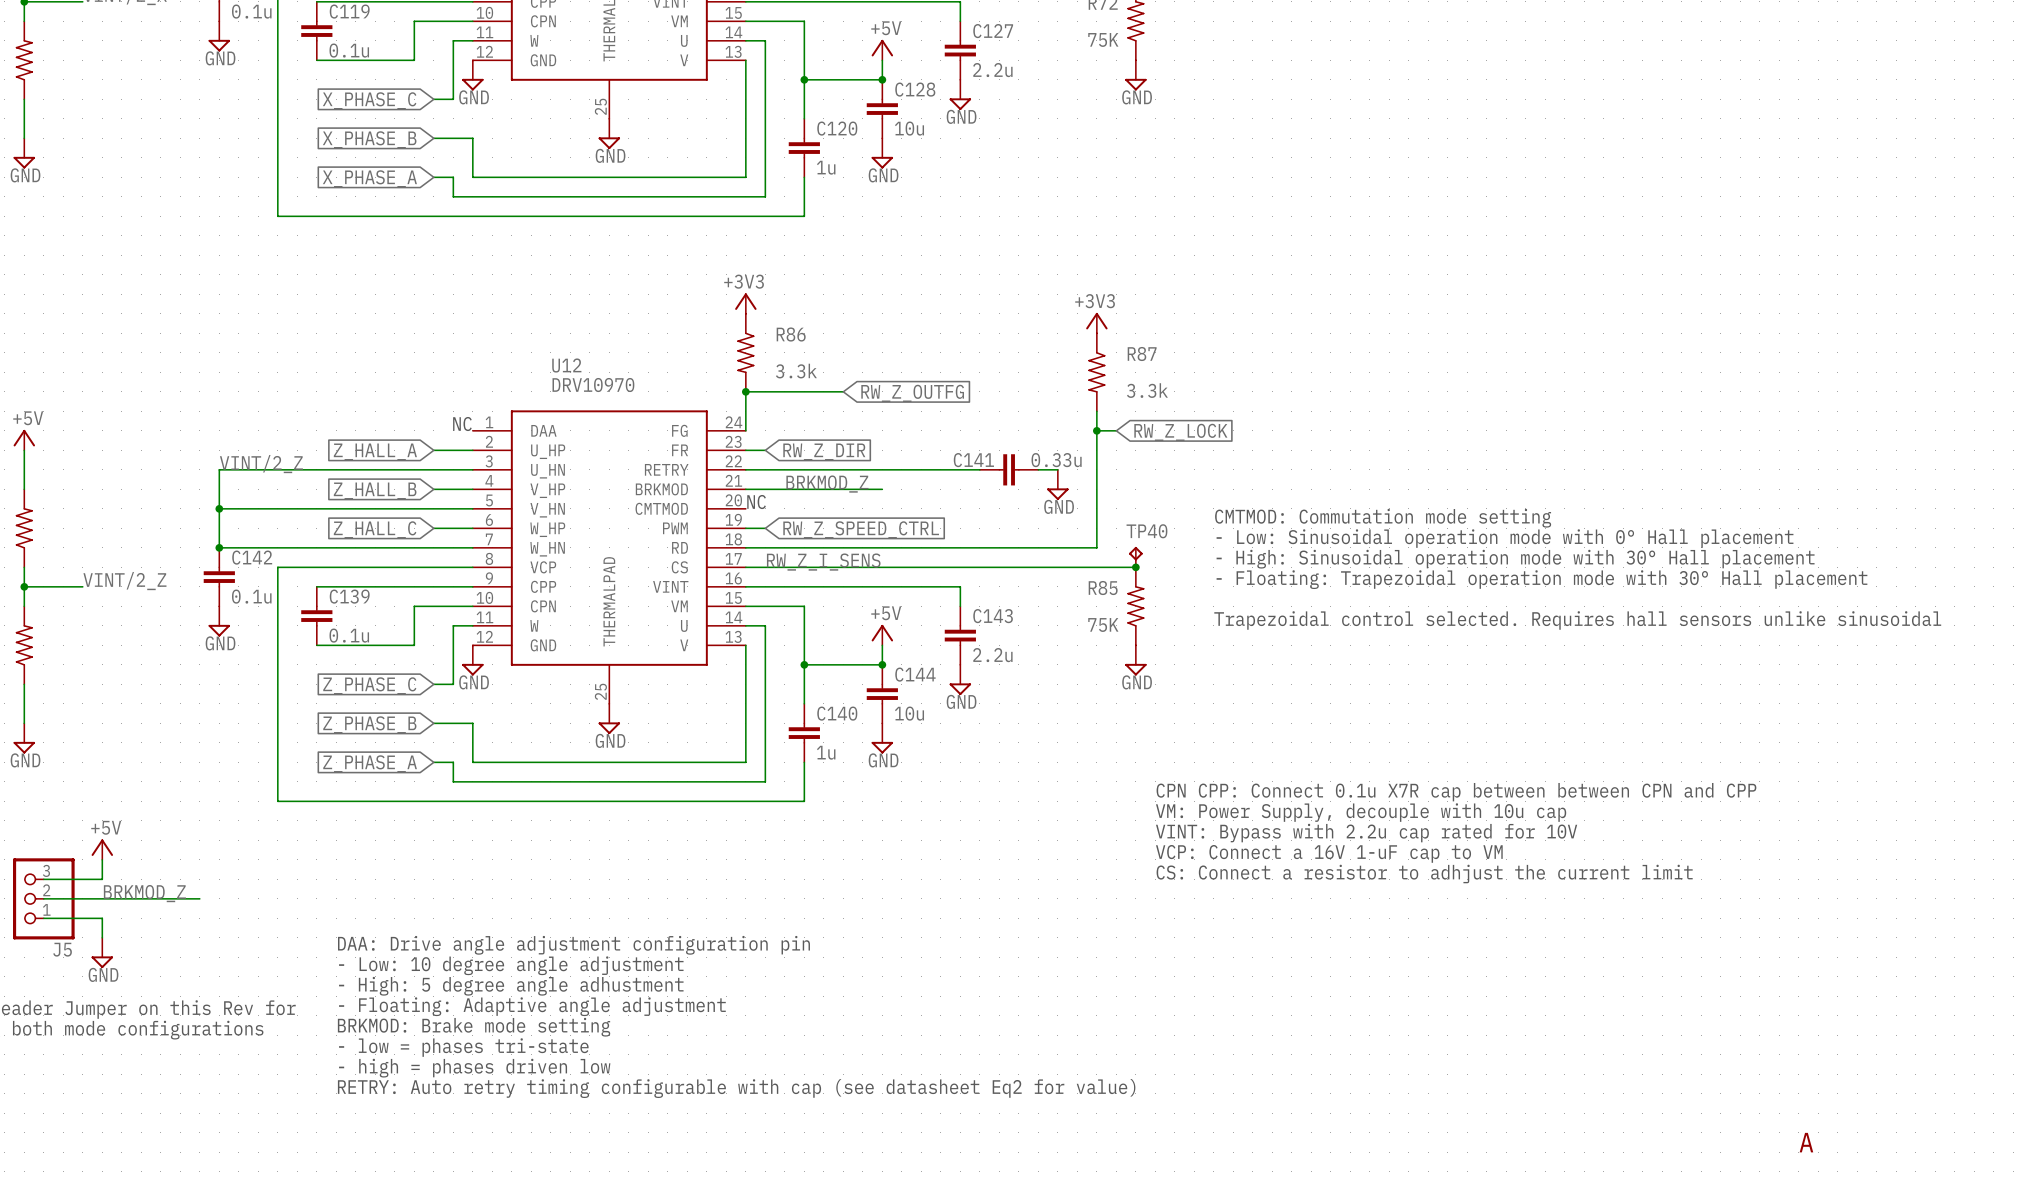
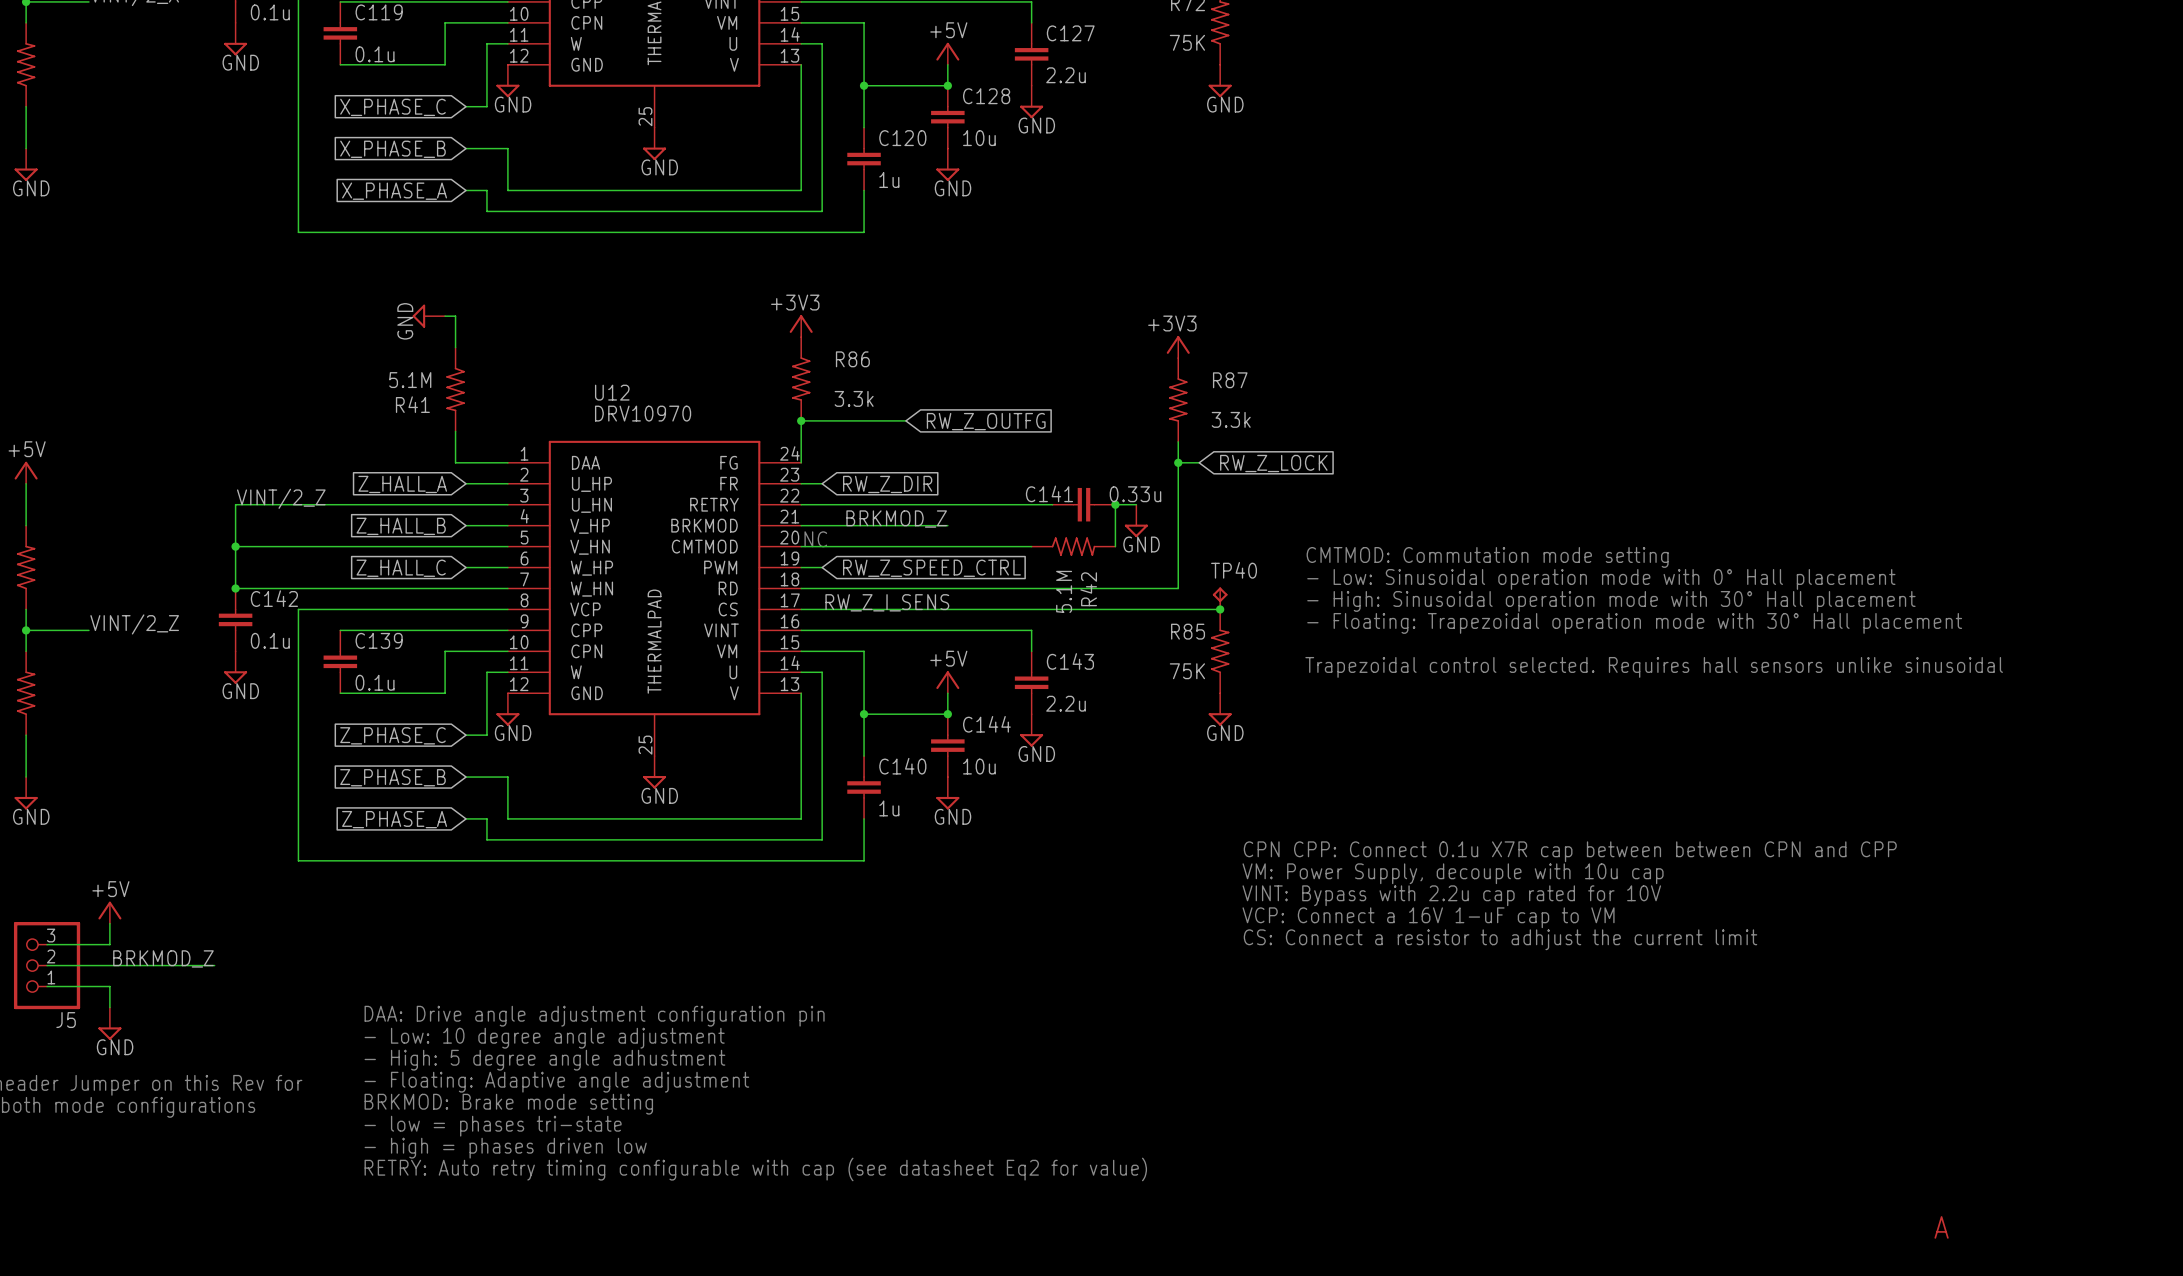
power symbol: none -> GND (428, 316)
wire: none -> (445, 316) (455, 316) (455, 347)
R41: none -> 5.1M (455, 389)
wire: none -> (455, 431) (455, 462) (507, 462)
text: NC (462, 424) -> none
wire: none -> (1115, 504) (1115, 546)
junction: none -> (1115, 504)
wire: none -> (801, 546) (1031, 546)
R42: none -> 5.1M (1073, 546)

